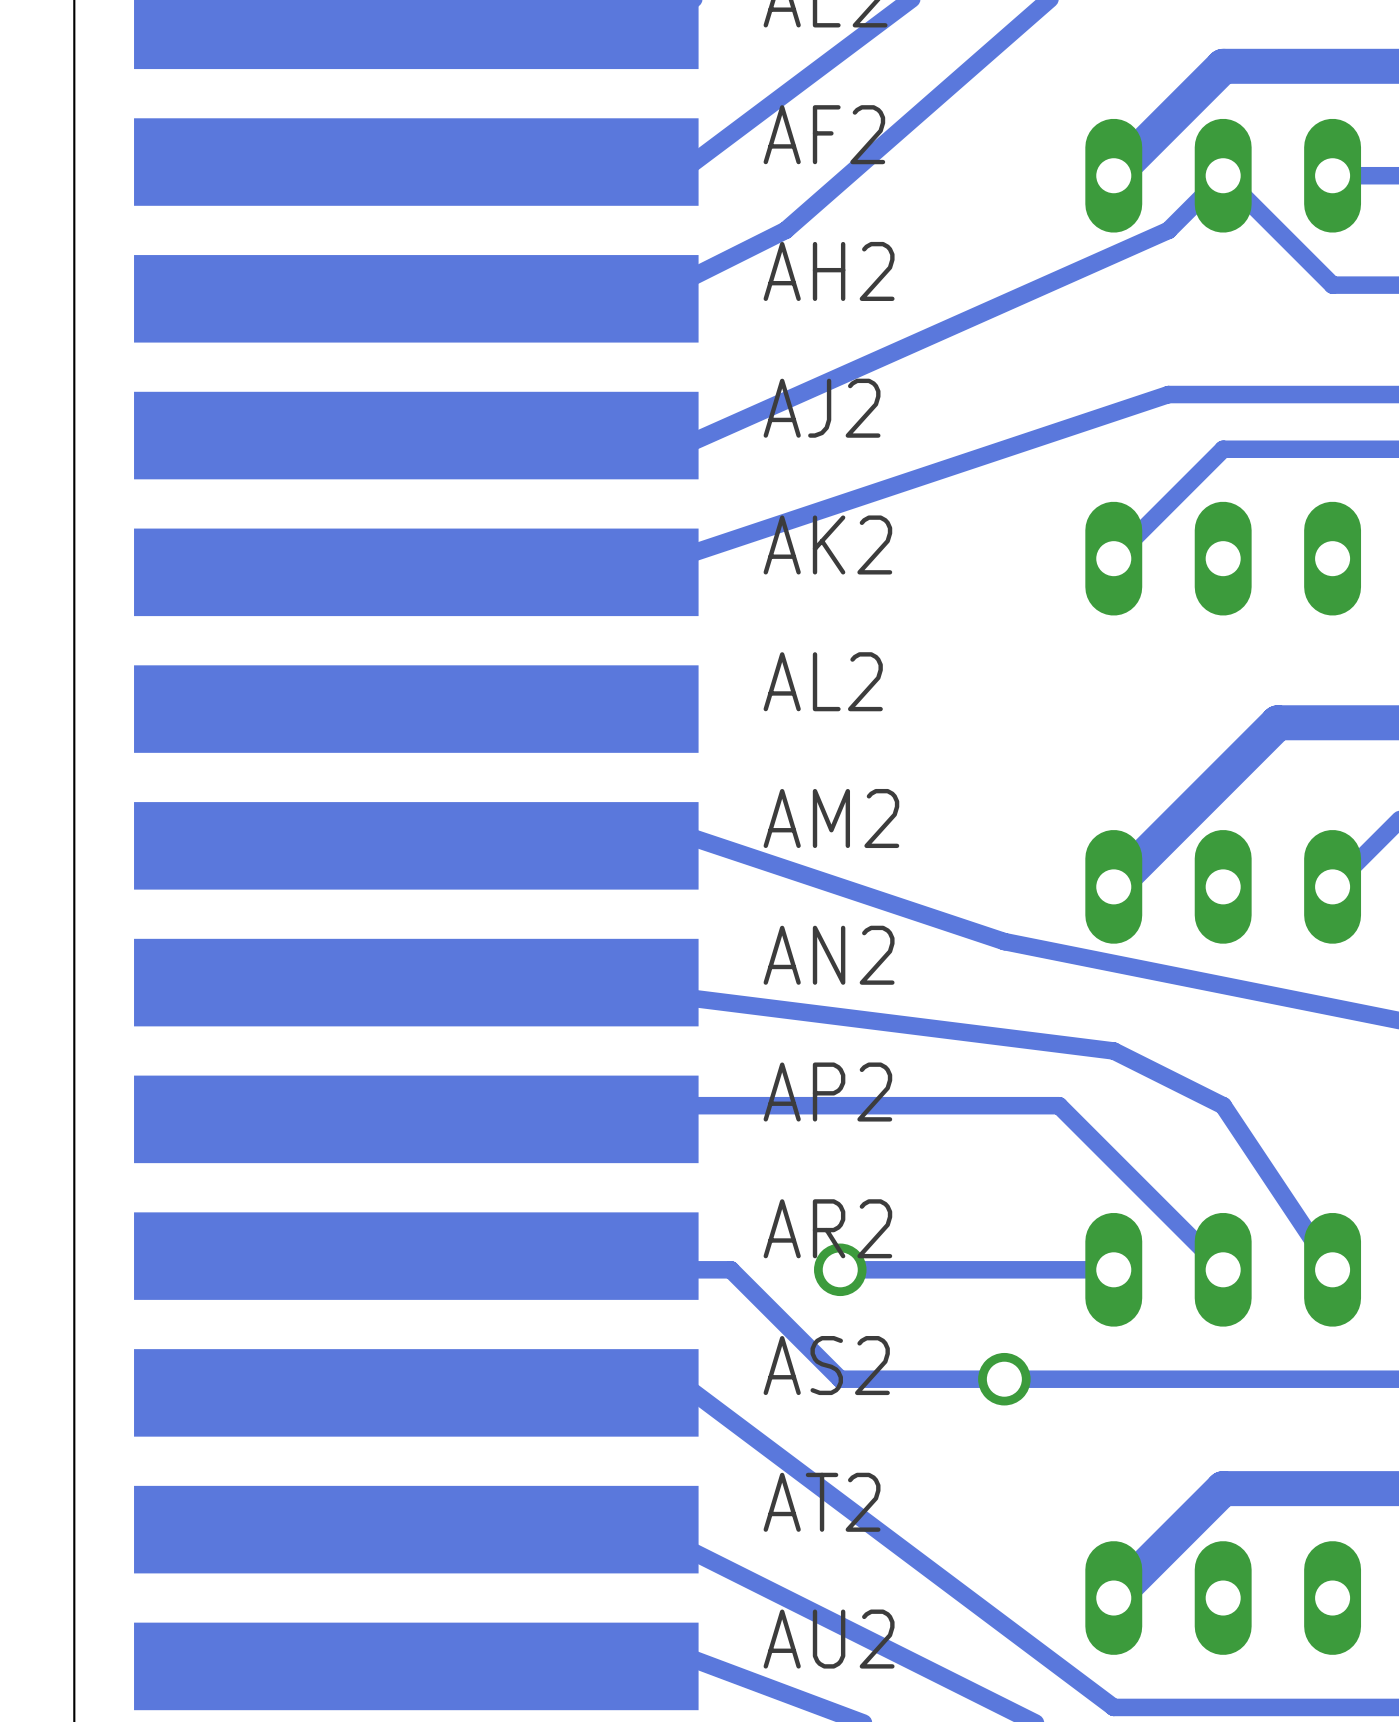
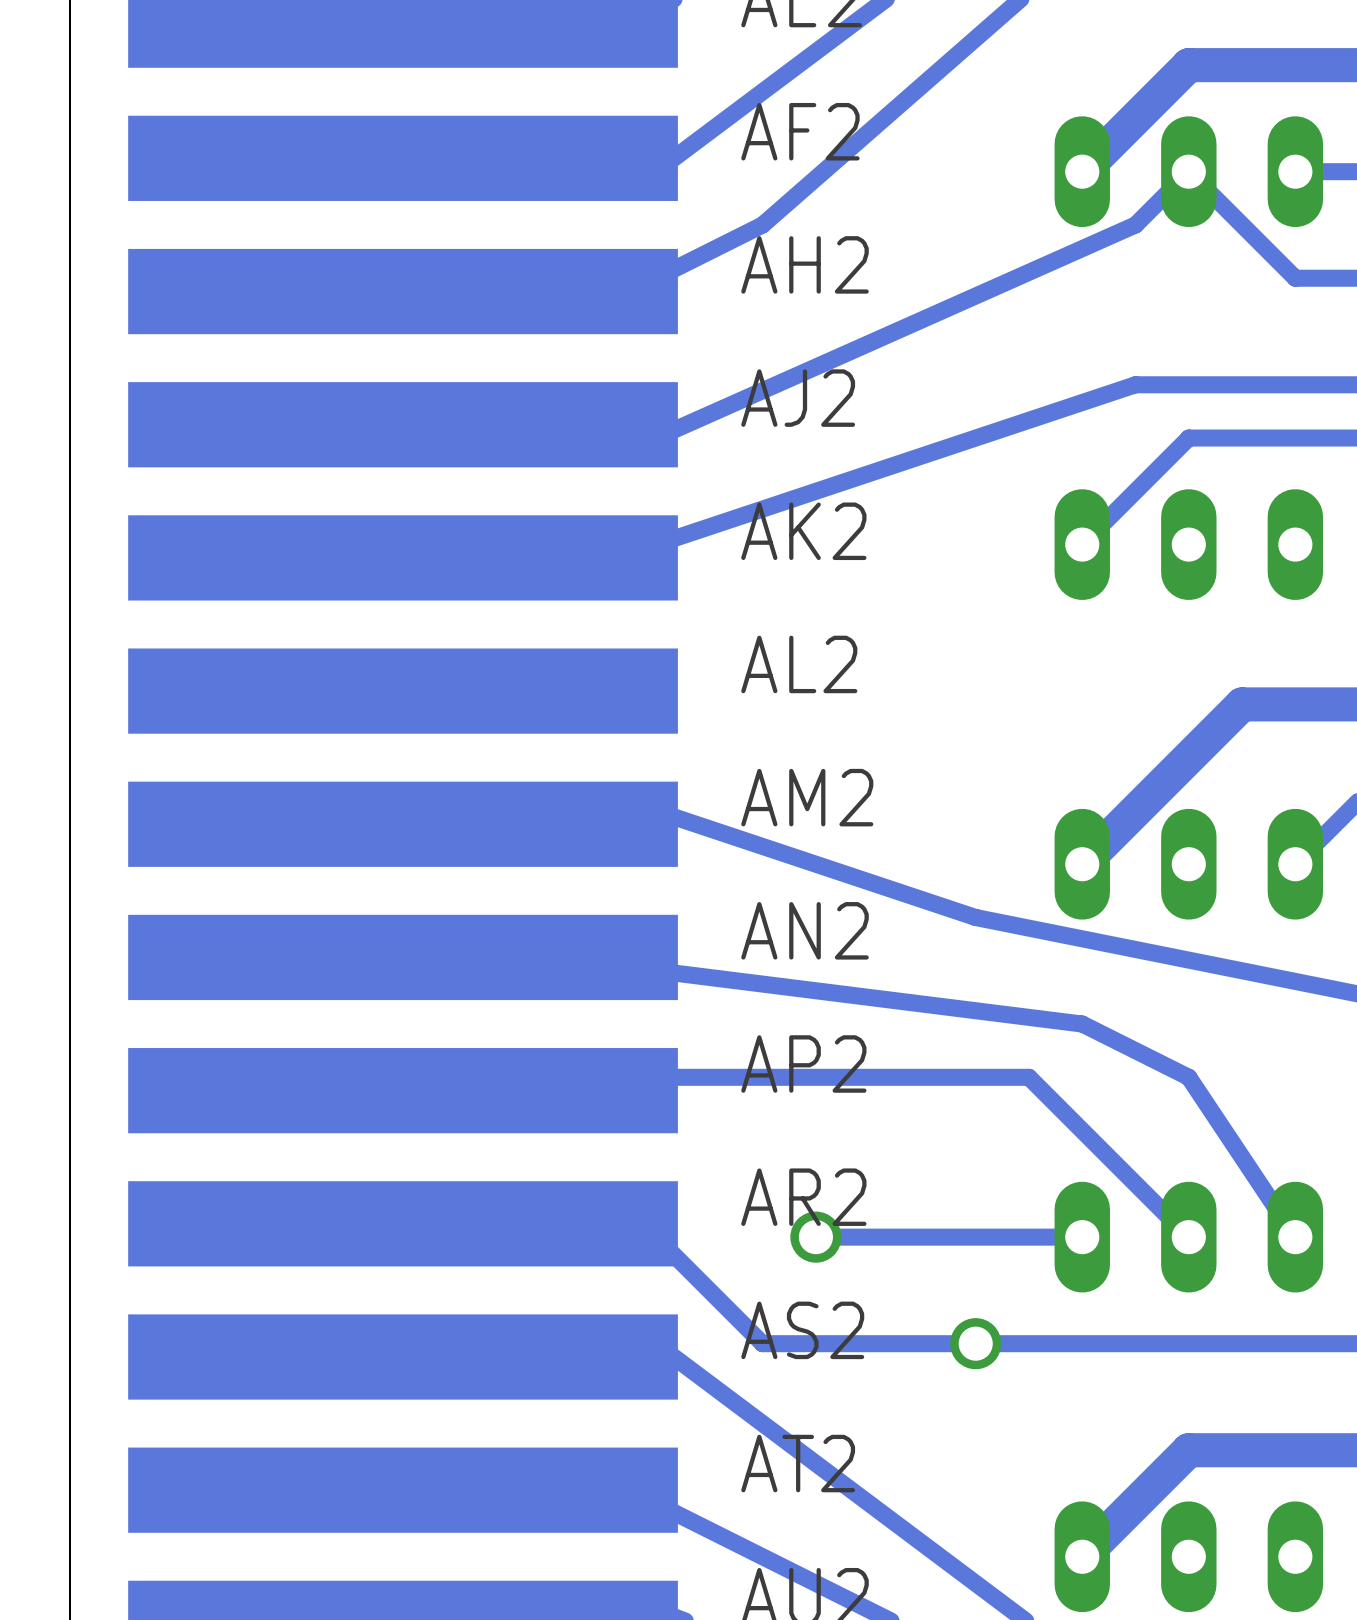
track: (676, 1269) (730, 1269) (840, 1379) -> (656, 1237) (762, 1343) (815, 1343)

